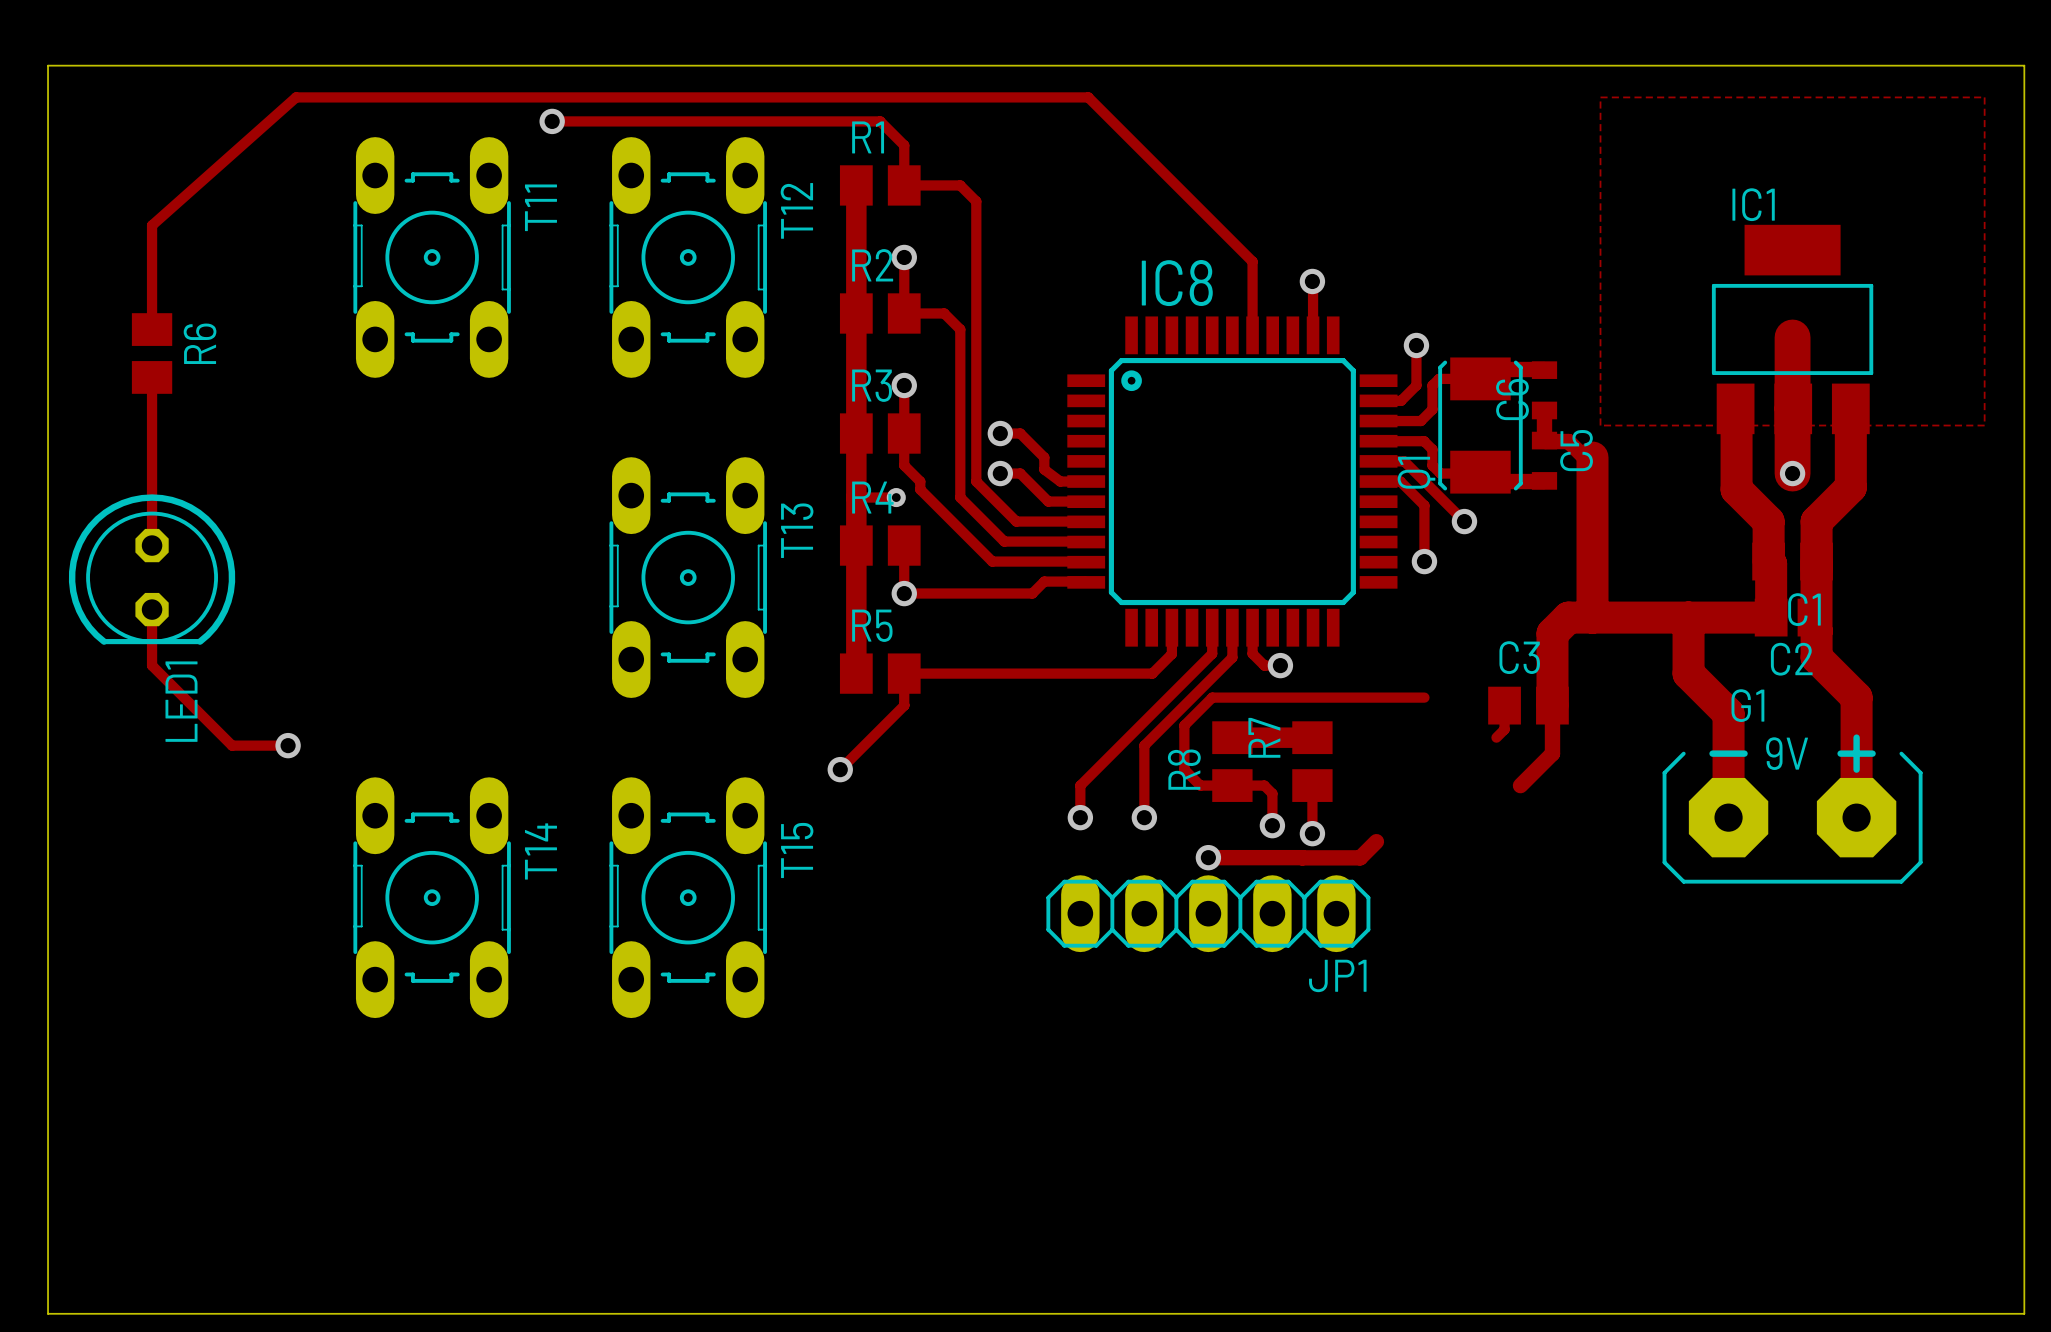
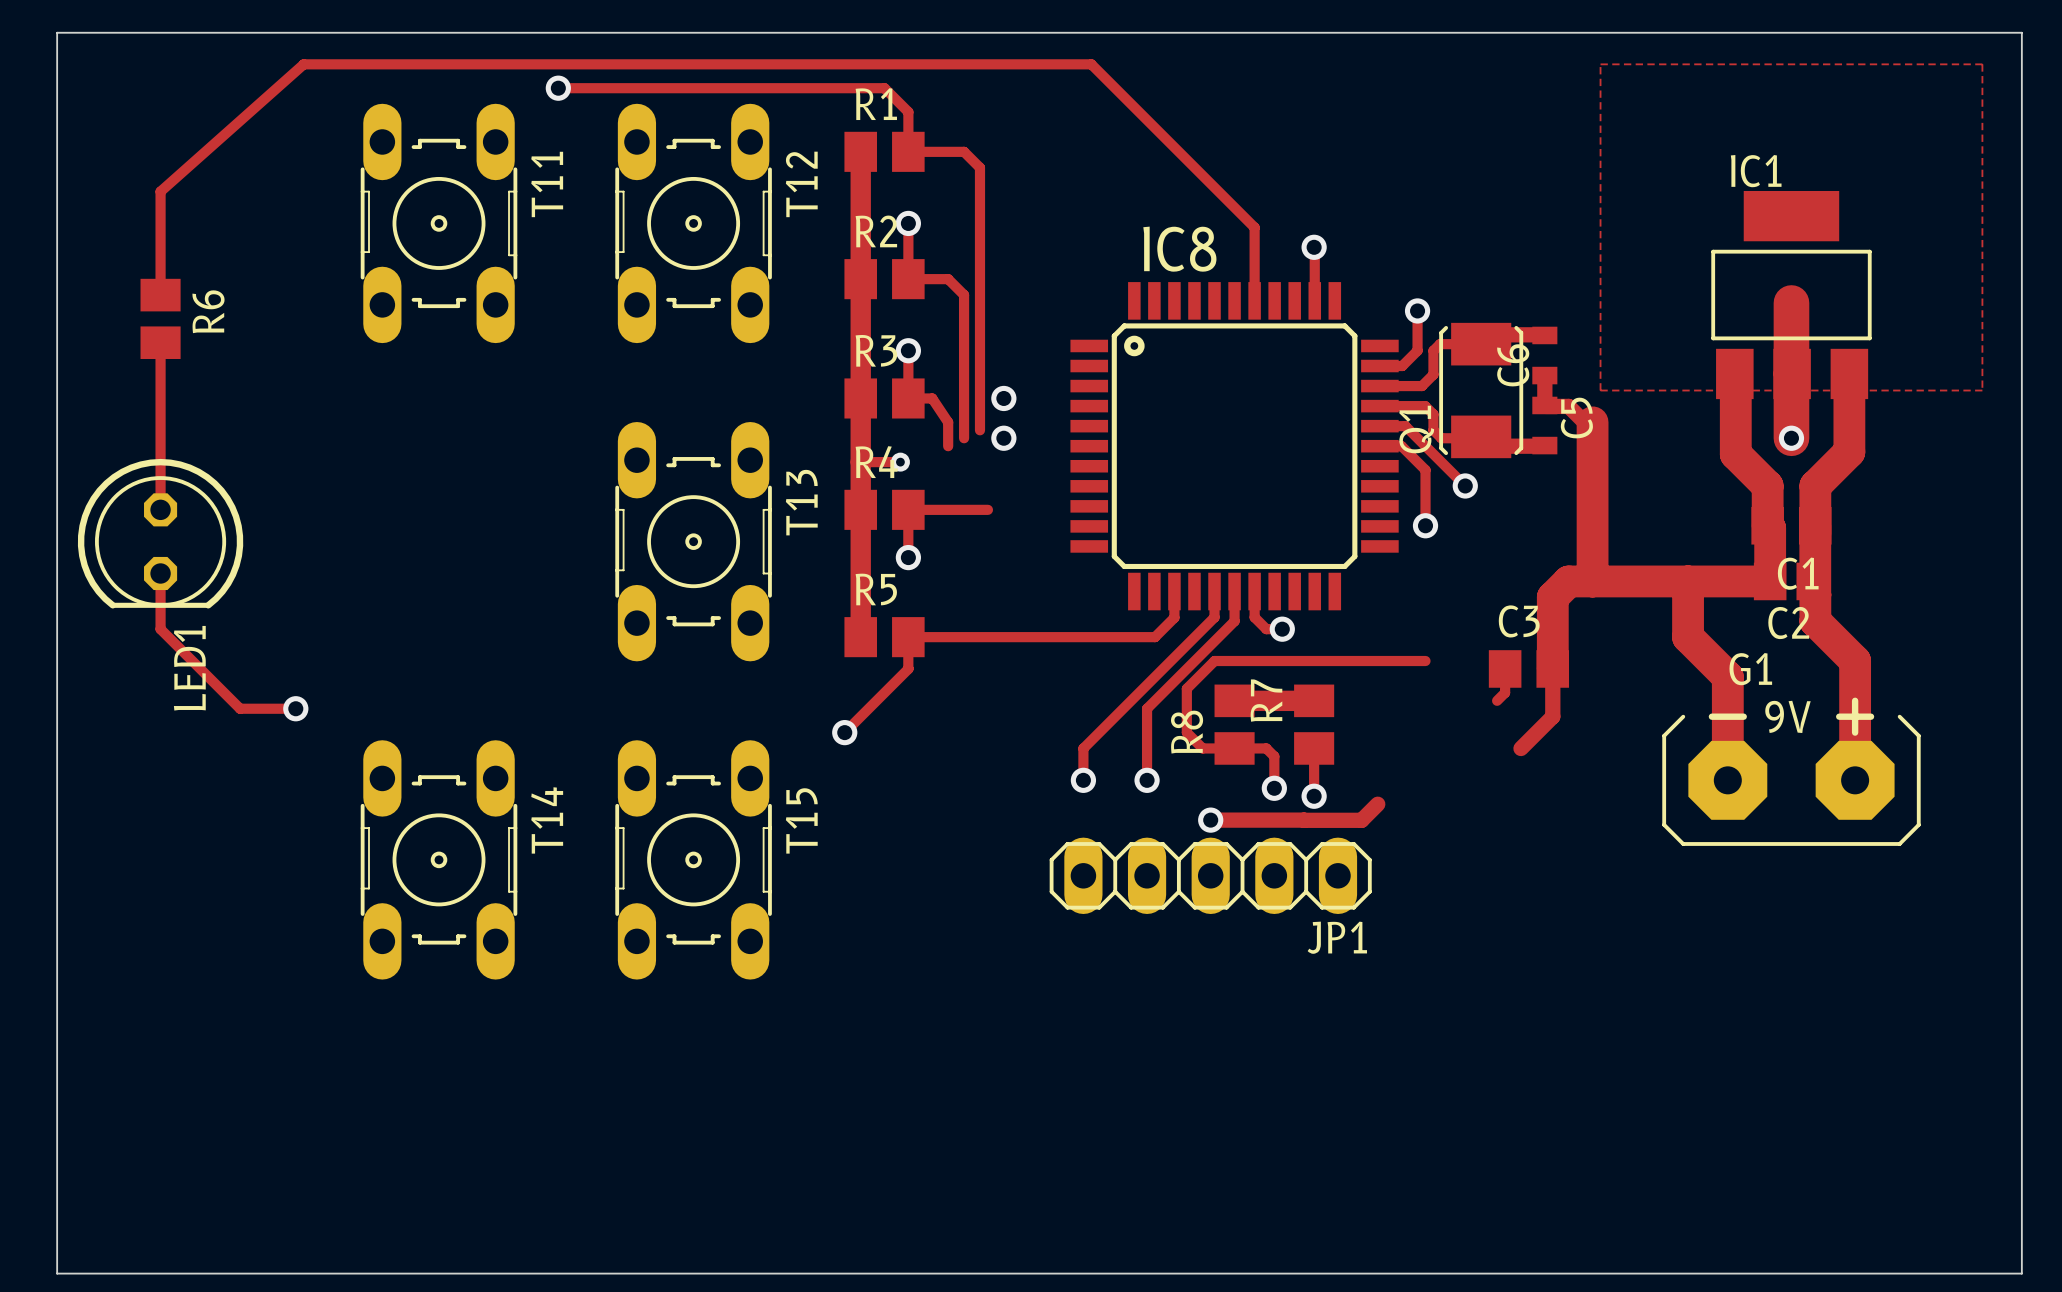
track: (904, 433) (904, 465) (920, 481) (920, 489) (992, 561) (1086, 562) -> (908, 398) (932, 398) (948, 422) (948, 446)
track: (1000, 433) (1020, 433) (1044, 457) (1044, 469) (1060, 481) (1092, 481) -> none
track: (976, 465) (976, 481) (1016, 521) (1085, 521) -> none
track: (960, 473) (960, 497) (1004, 541) (1086, 542) -> none
track: (1000, 473) (1020, 473) (1048, 501) (1088, 501) -> none
track: none -> (908, 509) (987, 509)
track: (1086, 582) (1044, 581) (1032, 593) (904, 593) -> none

